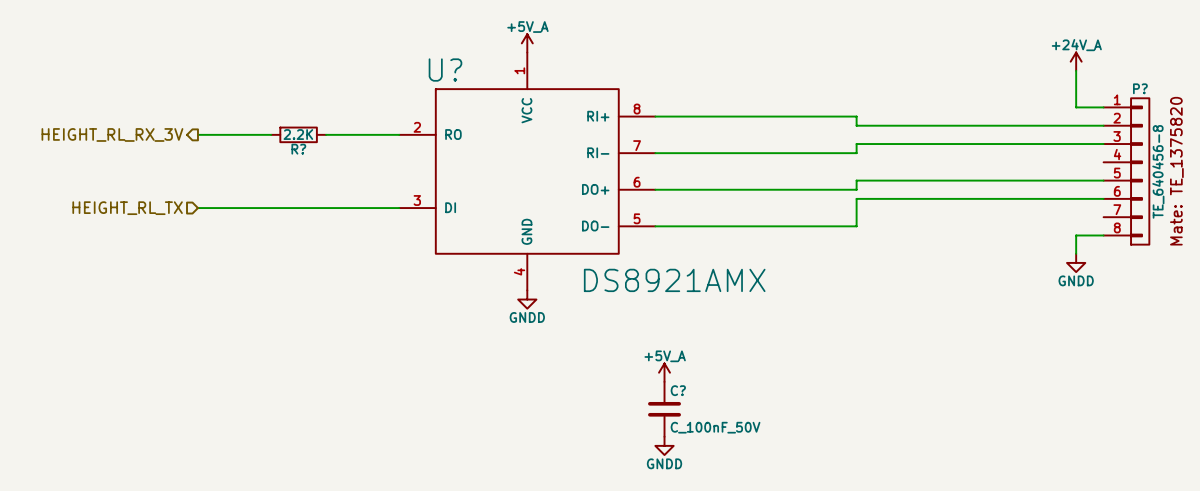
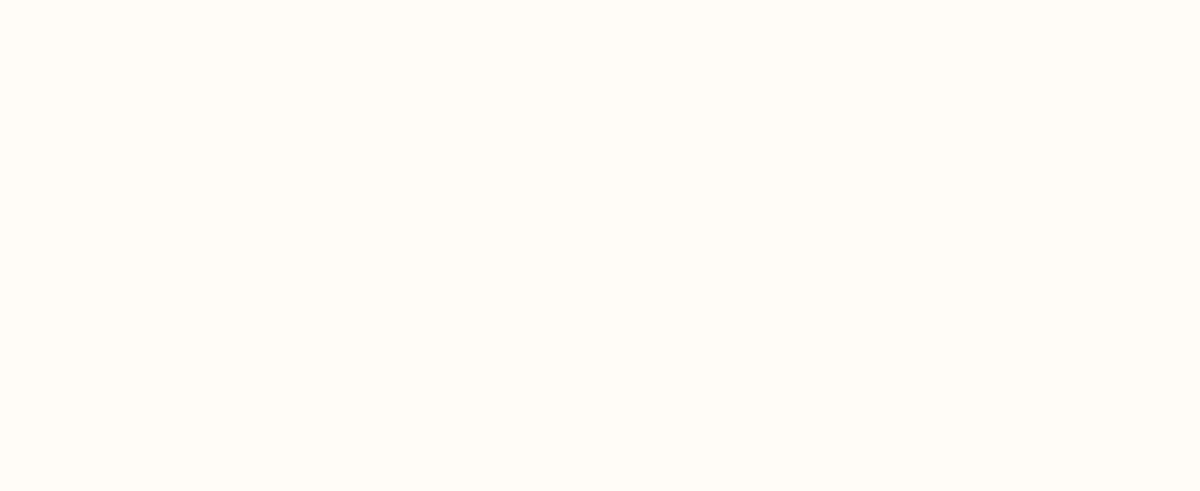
power symbol: +5V_A (527, 43) -> none
power symbol: +24V_A (1076, 61) -> none
wire: (1076, 70) (1076, 107) (1103, 107) -> none
wire: (655, 116) (856, 116) (856, 125) (1103, 125) -> none
hierarchical label: HEIGHT_RL_RX_3V (112, 134) -> none
wire: (197, 134) (271, 134) -> none
R?: 2.2K (298, 134) -> none
wire: (326, 134) (399, 134) -> none
wire: (1103, 144) (856, 144) (856, 153) (655, 153) -> none
U?: DS8921AMX (527, 171) -> none
P?: TE_640456-8 (1126, 171) -> none
wire: (1103, 180) (856, 180) (856, 189) (655, 189) -> none
wire: (1103, 198) (856, 198) (856, 226) (655, 226) -> none
hierarchical label: HEIGHT_RL_TX (127, 208) -> none
wire: (197, 208) (399, 208) -> none
wire: (1103, 235) (1076, 235) (1076, 253) -> none
power symbol: GNDD (1076, 262) -> none
power symbol: GNDD (527, 299) -> none
power symbol: +5V_A (664, 372) -> none
C?: C_100nF_50V (664, 409) -> none
power symbol: GNDD (664, 445) -> none

